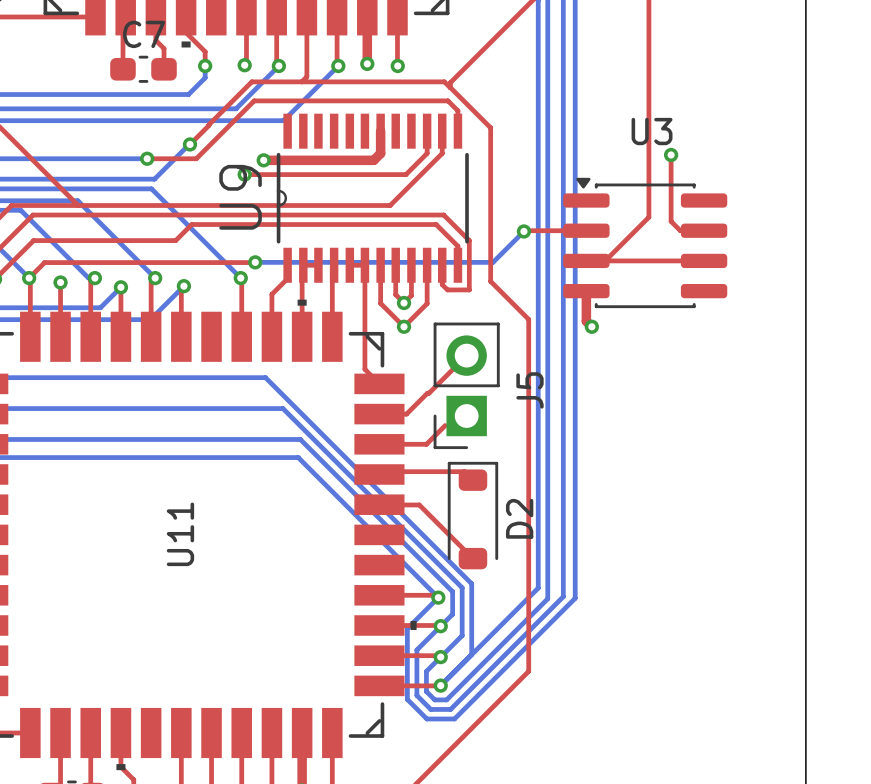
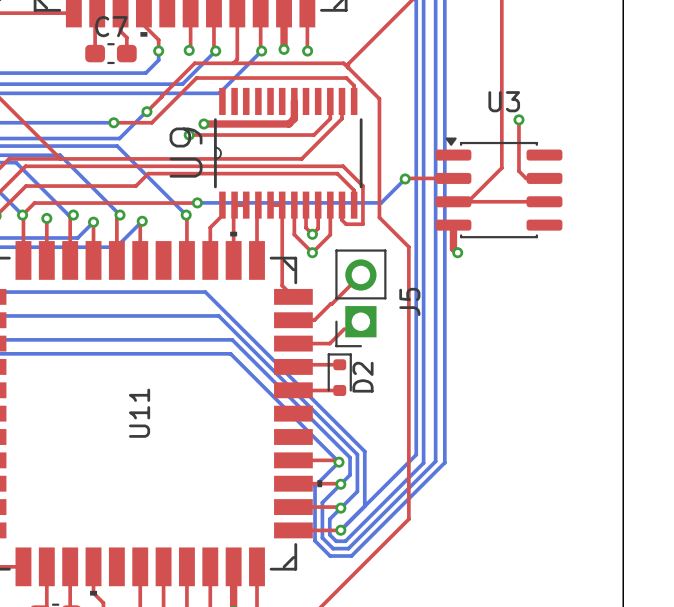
D2 footprint: [447, 461, 499, 570] -> [327, 353, 352, 397]
top track: (439, 471) (464, 471) (472, 480) -> none
top track: (419, 504) (472, 558) -> (324, 390) (339, 390)

